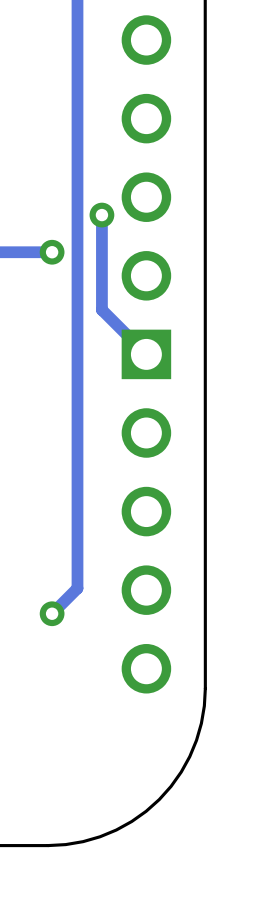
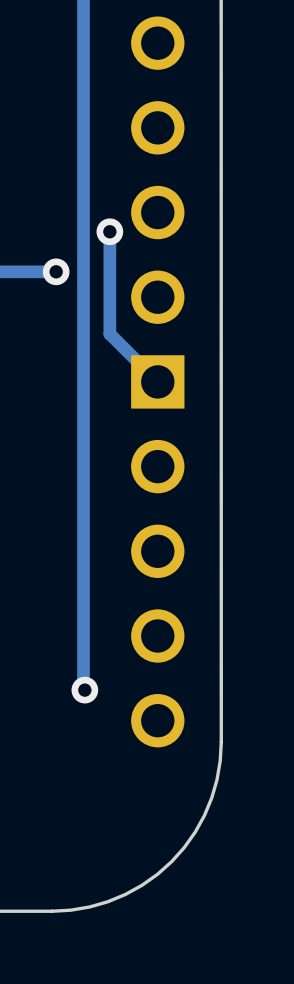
track: (77, 588) (52, 613) -> (83, 634) (84, 690)
via position: (52, 613) -> (84, 690)

